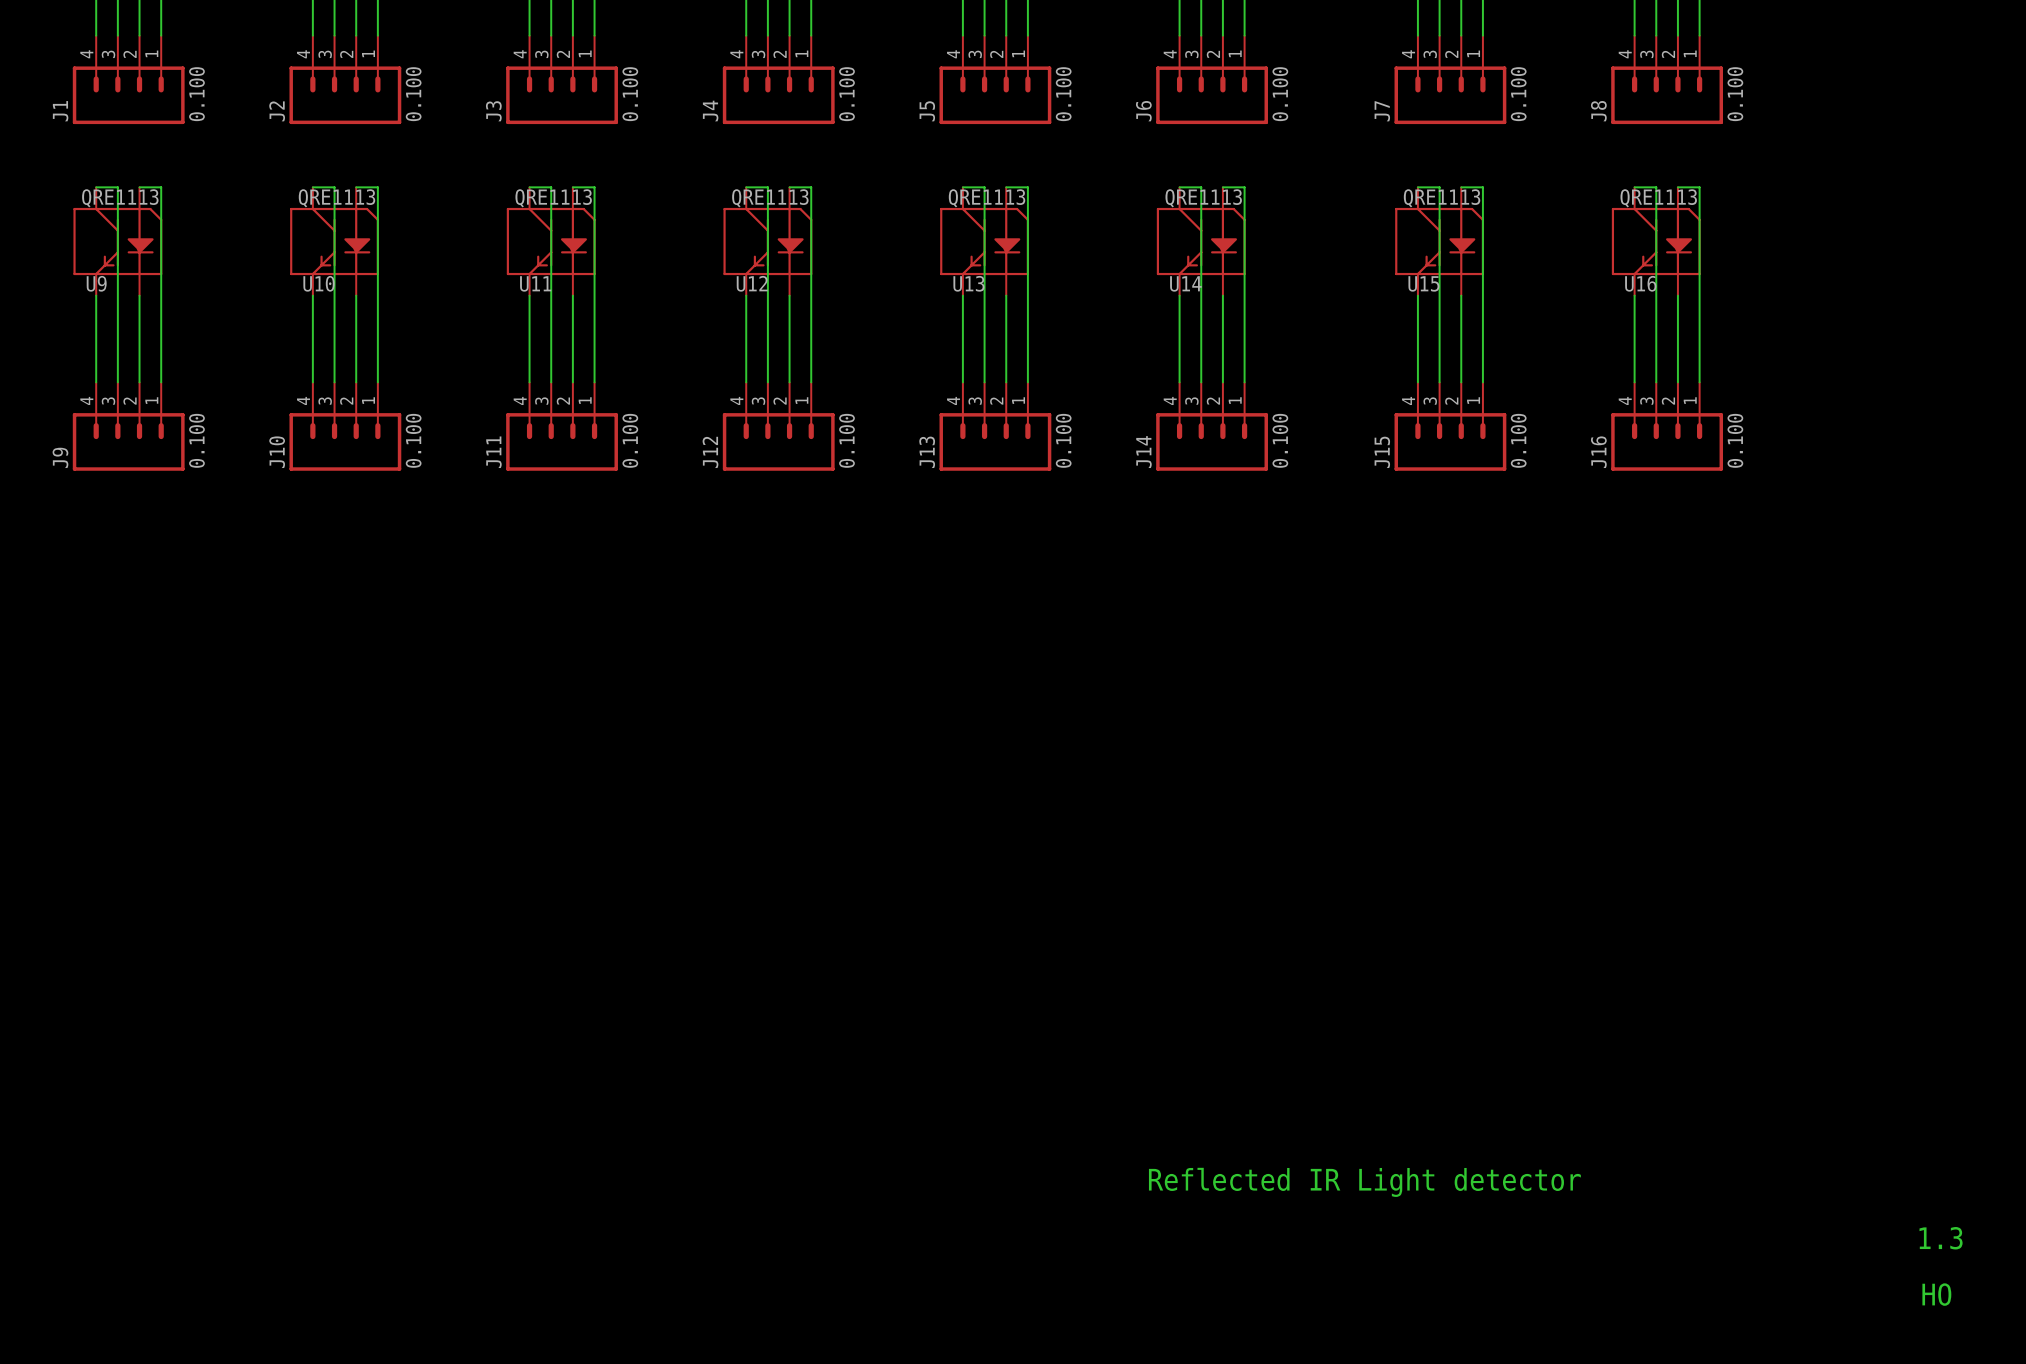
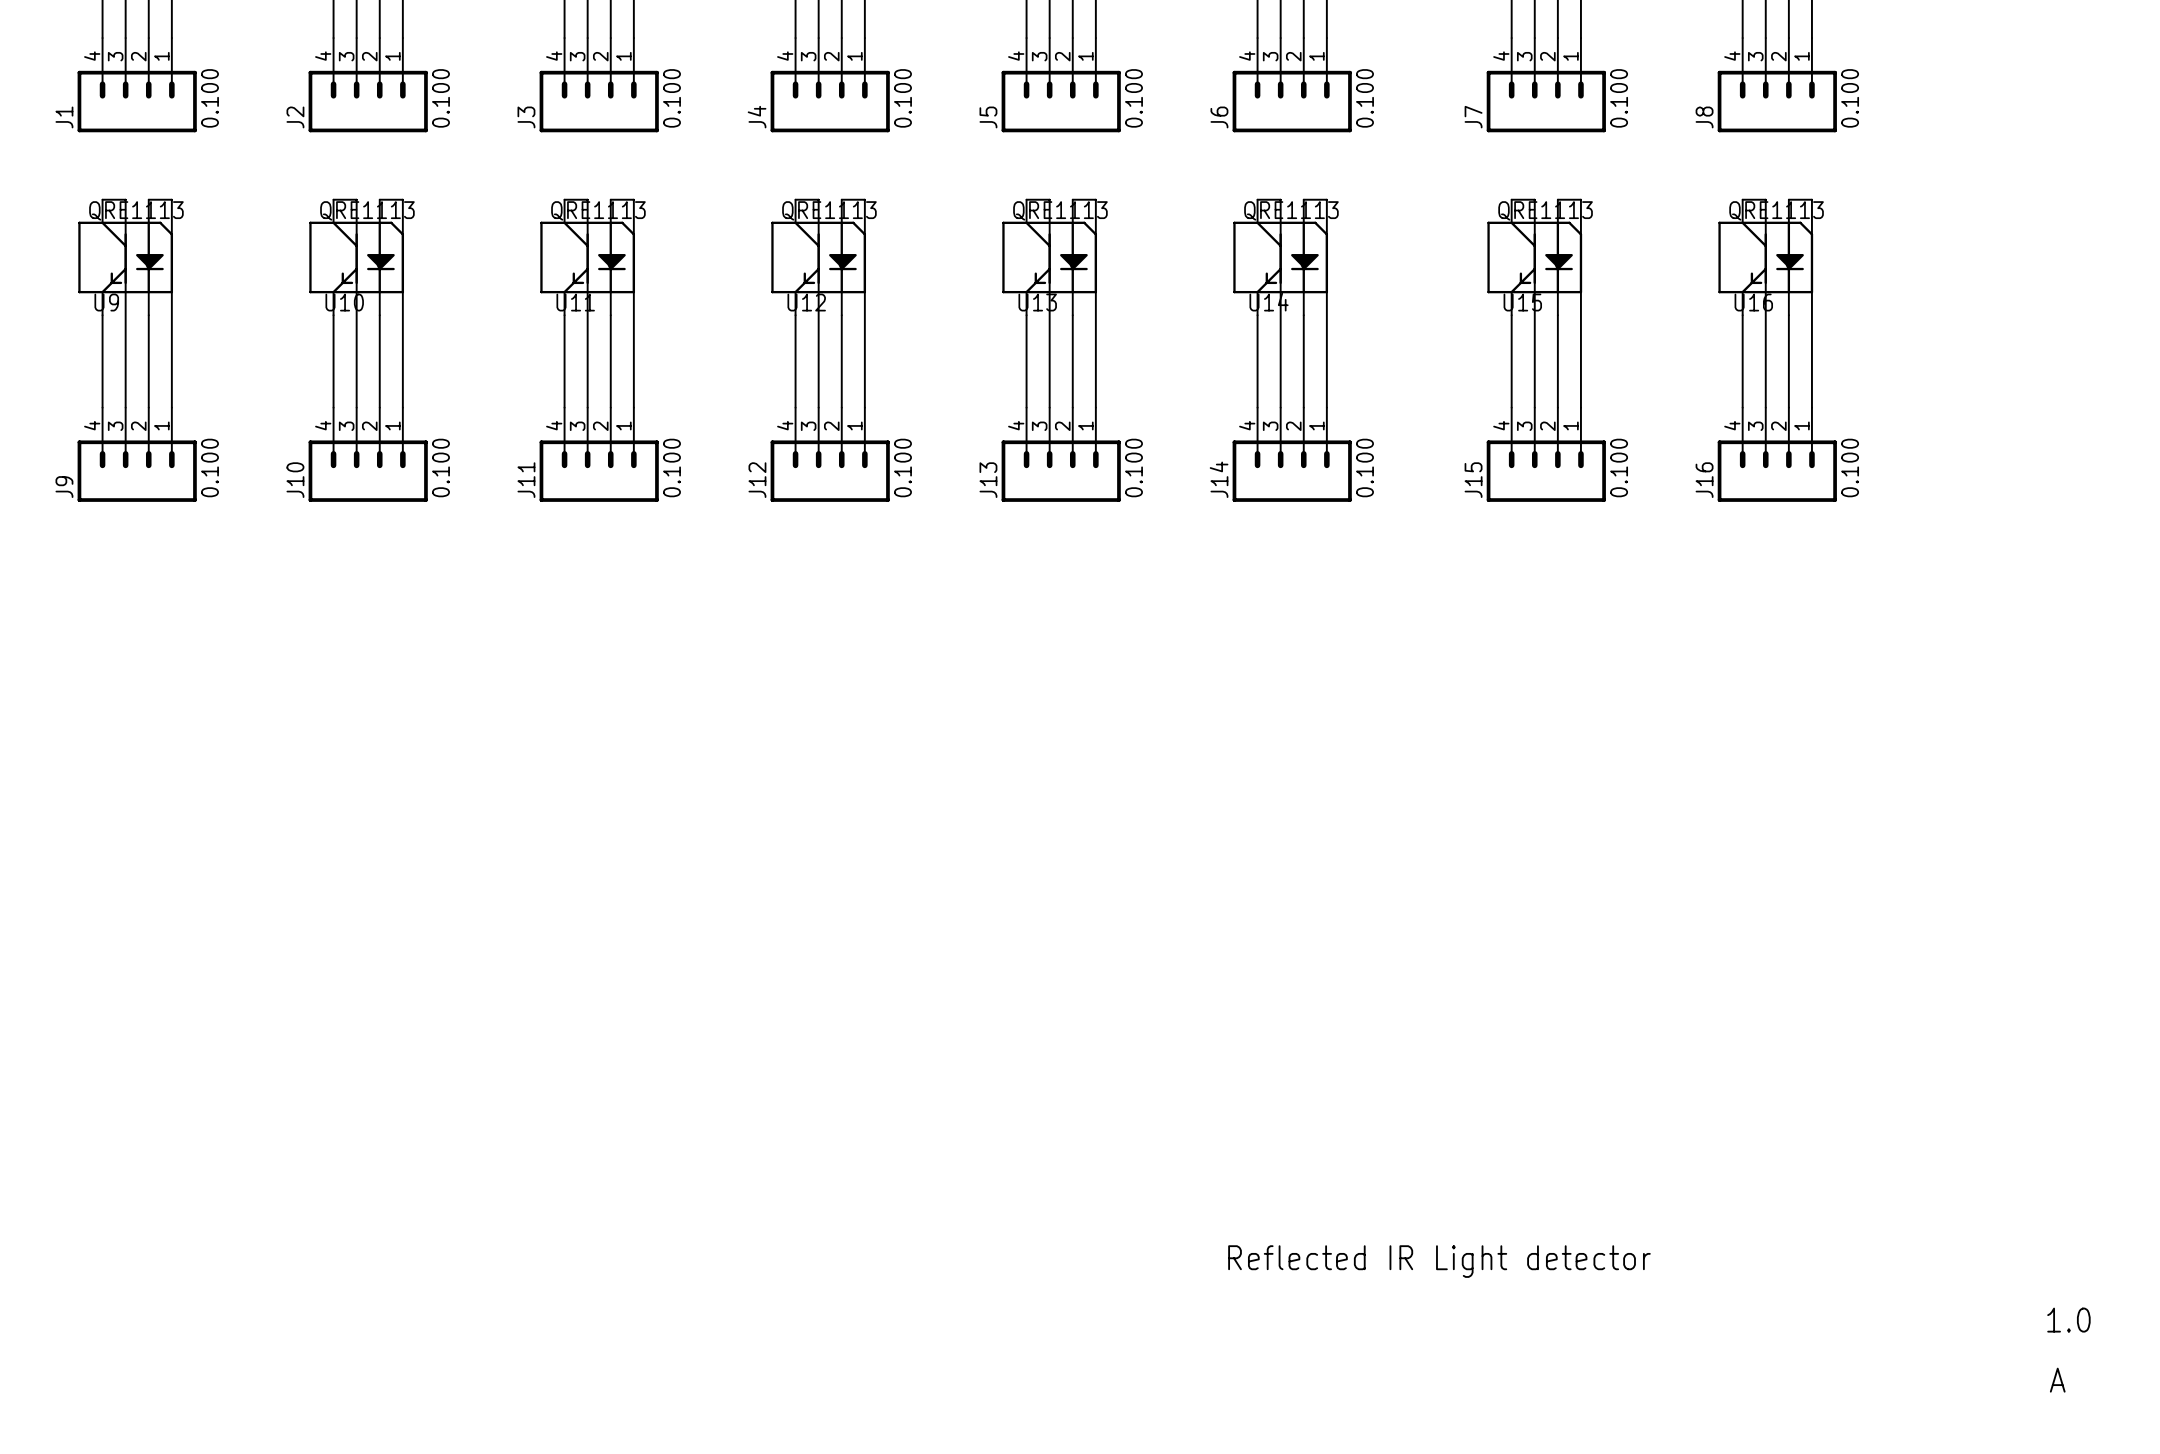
text: 1.3 (1941, 1238) -> 1.0 (2068, 1320)
text: HO (1936, 1294) -> A (2057, 1380)

